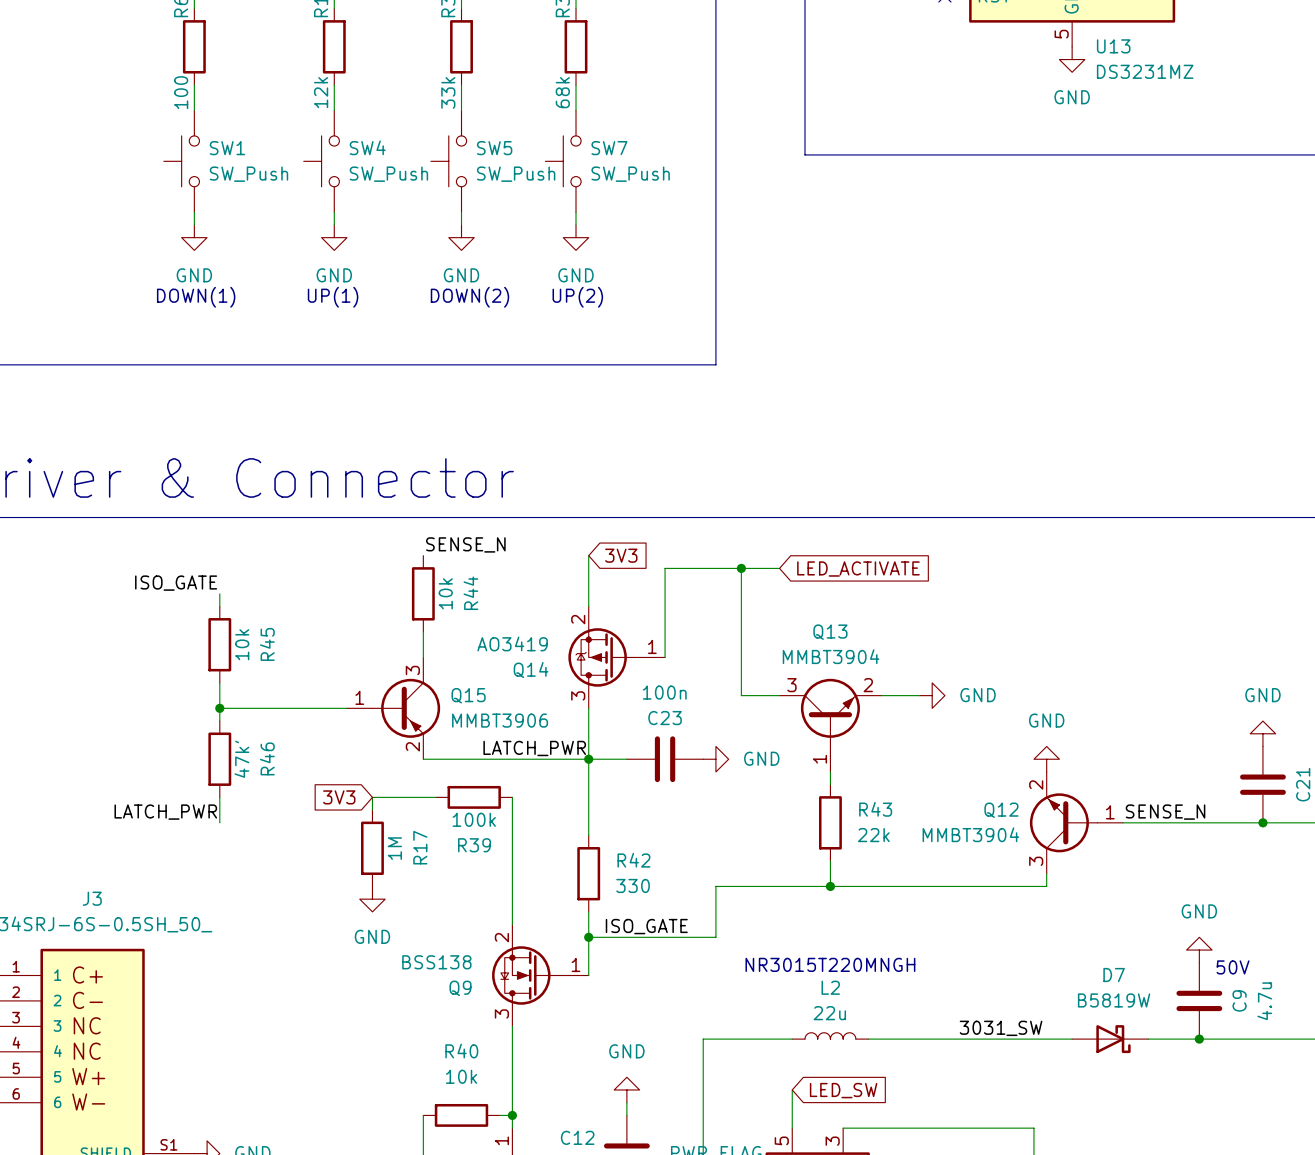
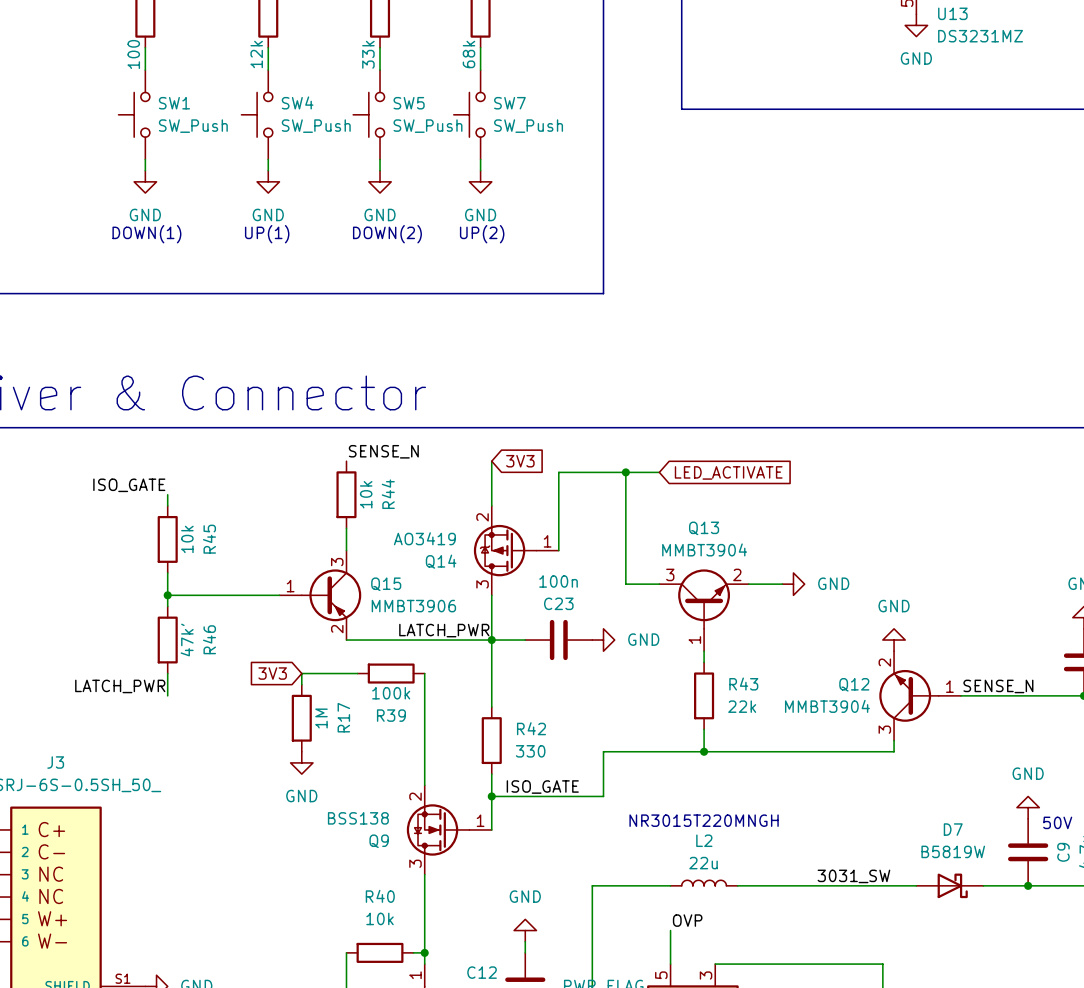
label: none -> OVP (687, 920)
global label: LED_SW (843, 1090) -> none

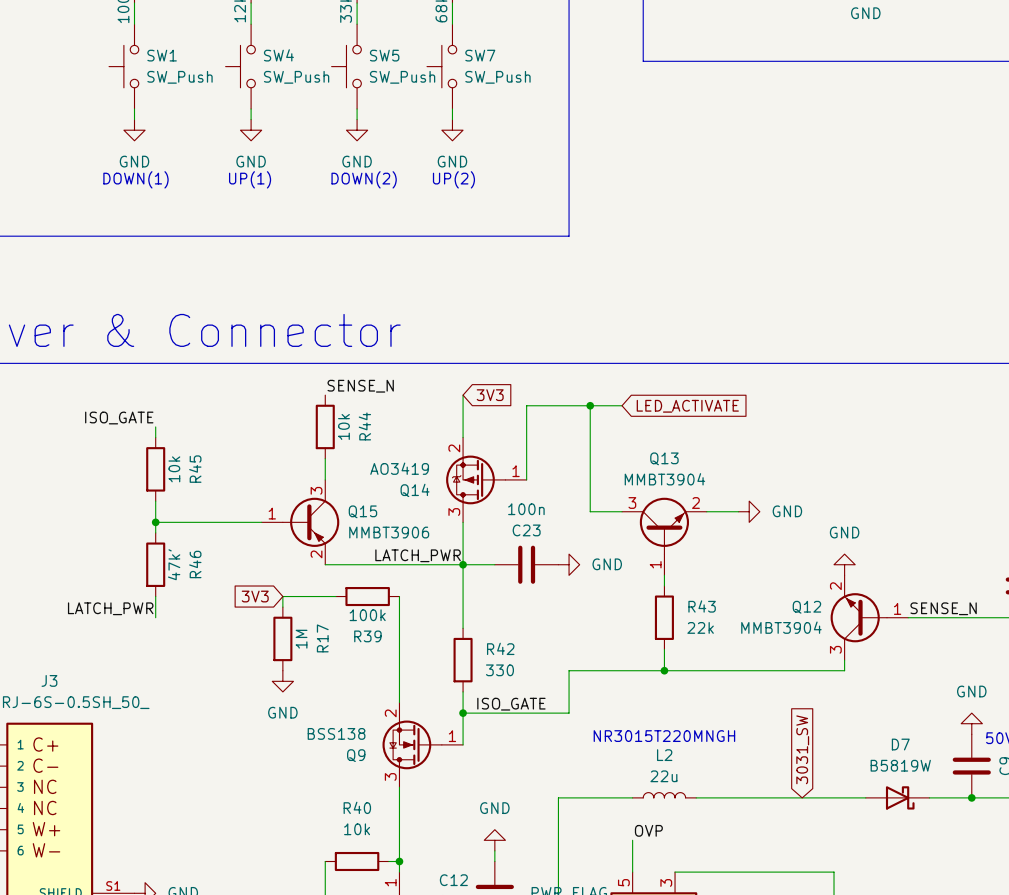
global label: none -> 3031_SW (802, 749)
label: 3031_SW (853, 876) -> none

